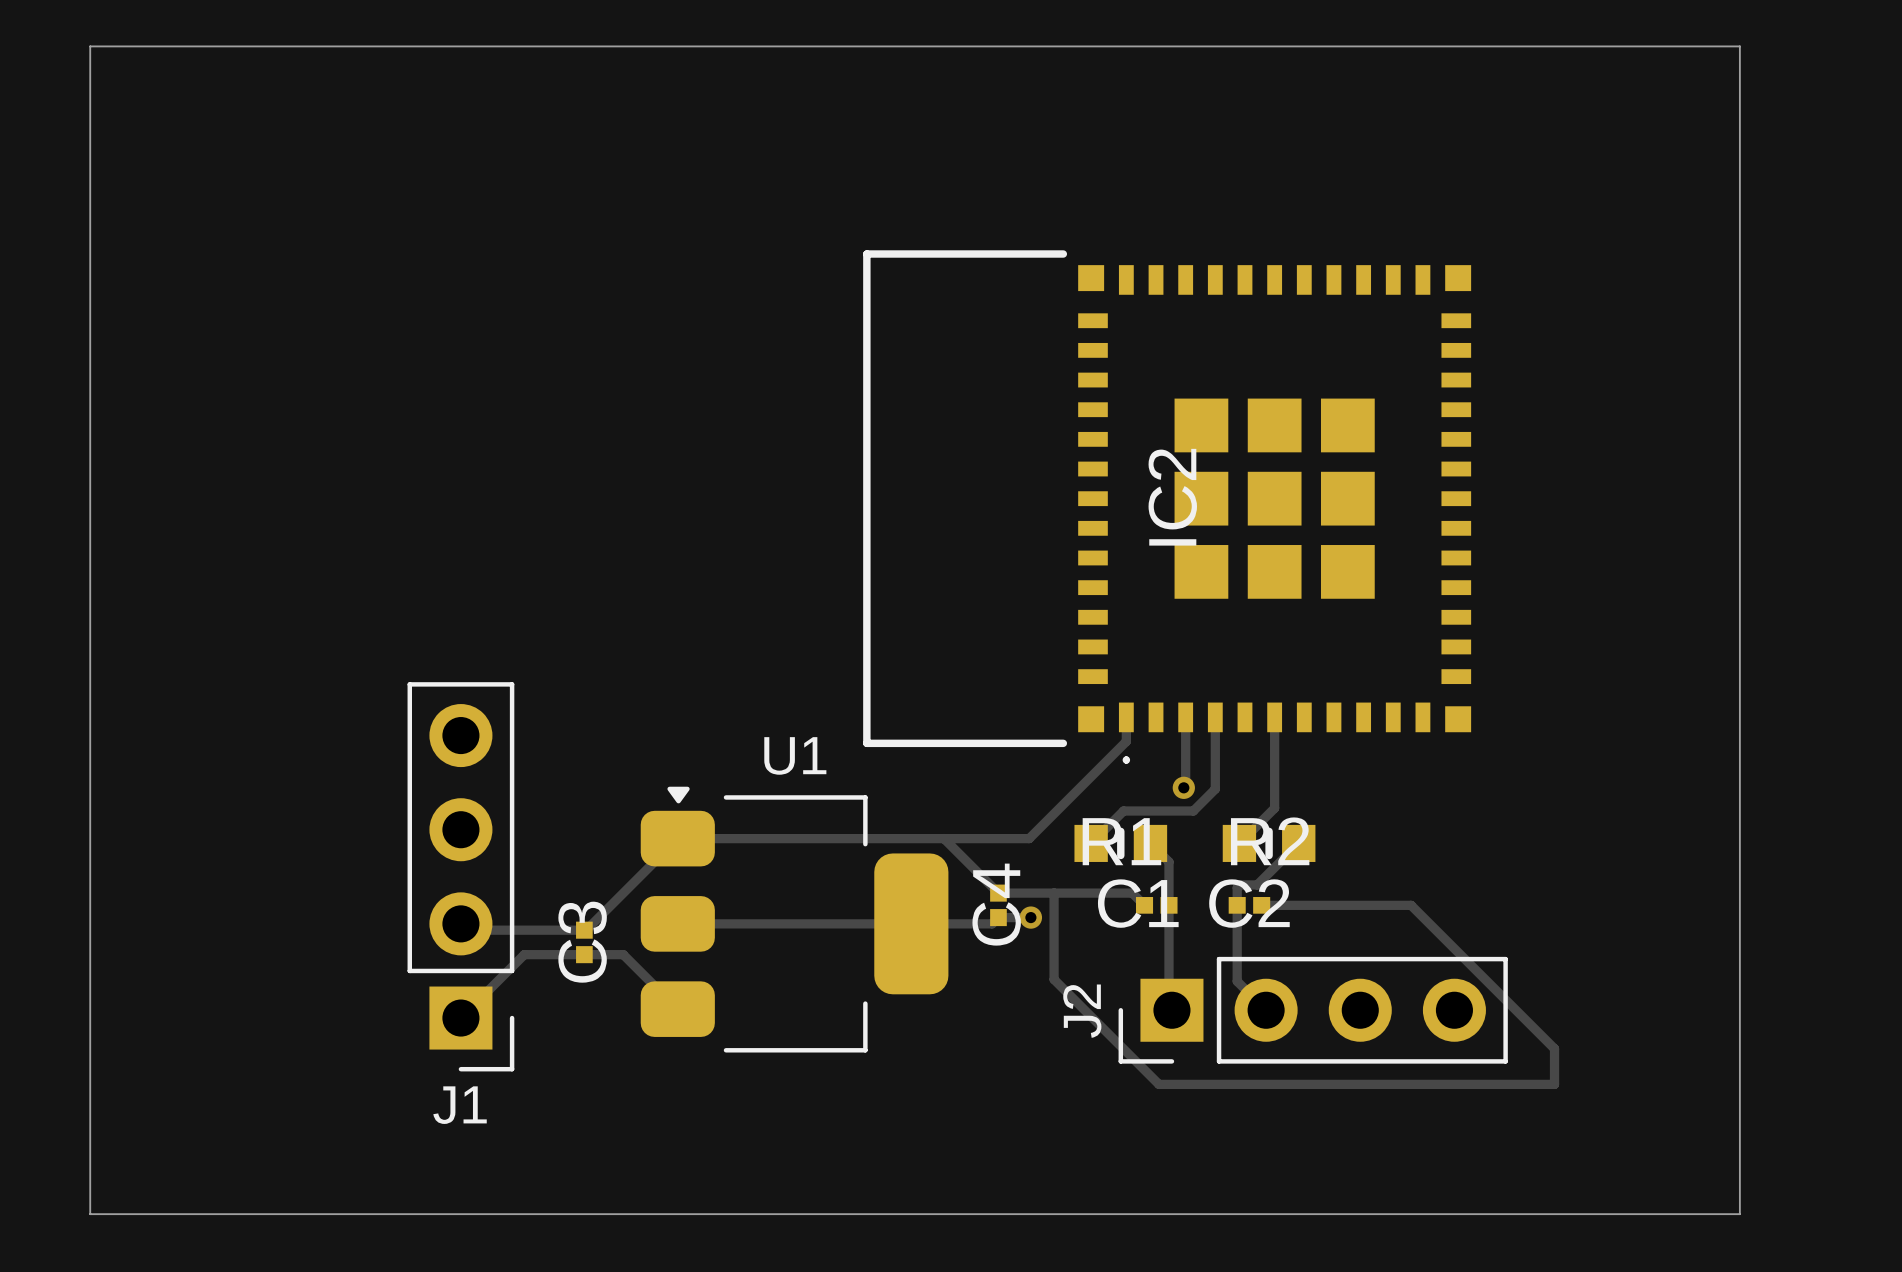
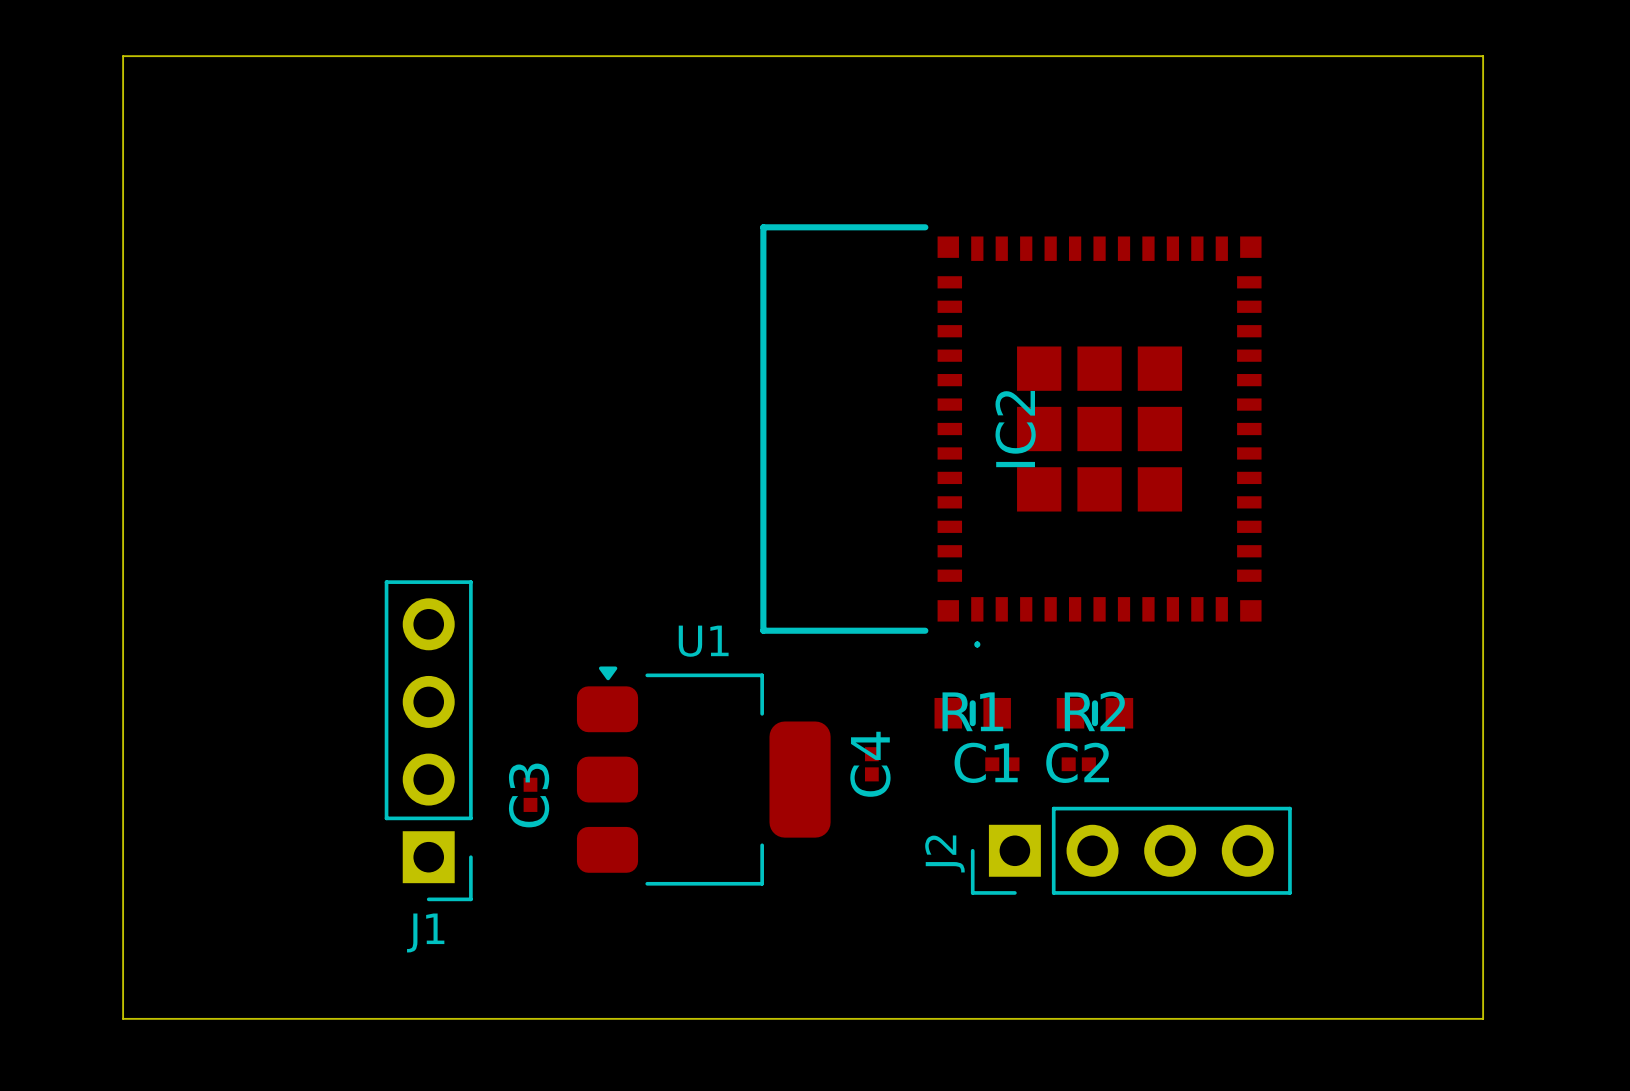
track: (1126, 717) (1126, 741) (1029, 838) (677, 838) (586, 930) (467, 930) (460, 923) -> none
track: (1185, 717) (1185, 785) (1183, 787) -> none
track: (1215, 717) (1215, 789) (1193, 811) (1123, 811) (1091, 843) -> none
track: (1274, 717) (1274, 808) (1239, 843) -> none
via: (1183, 787) -> none
track: (943, 838) (998, 893) (1132, 893) (1144, 905) -> none
track: (1150, 843) (1168, 861) (1168, 1007) (1171, 1010) -> none
track: (1298, 843) (1257, 884) (1239, 884) (1237, 887) (1237, 981) (1266, 1010) -> none
track: (1054, 893) (1054, 979) (1158, 1084) (1554, 1084) (1554, 1048) (1411, 905) (1261, 905) -> none
track: (1030, 917) (998, 917) (992, 923) (677, 923) -> none
via: (1030, 917) -> none
track: (677, 1009) (623, 954) (524, 954) (460, 1018) -> none

